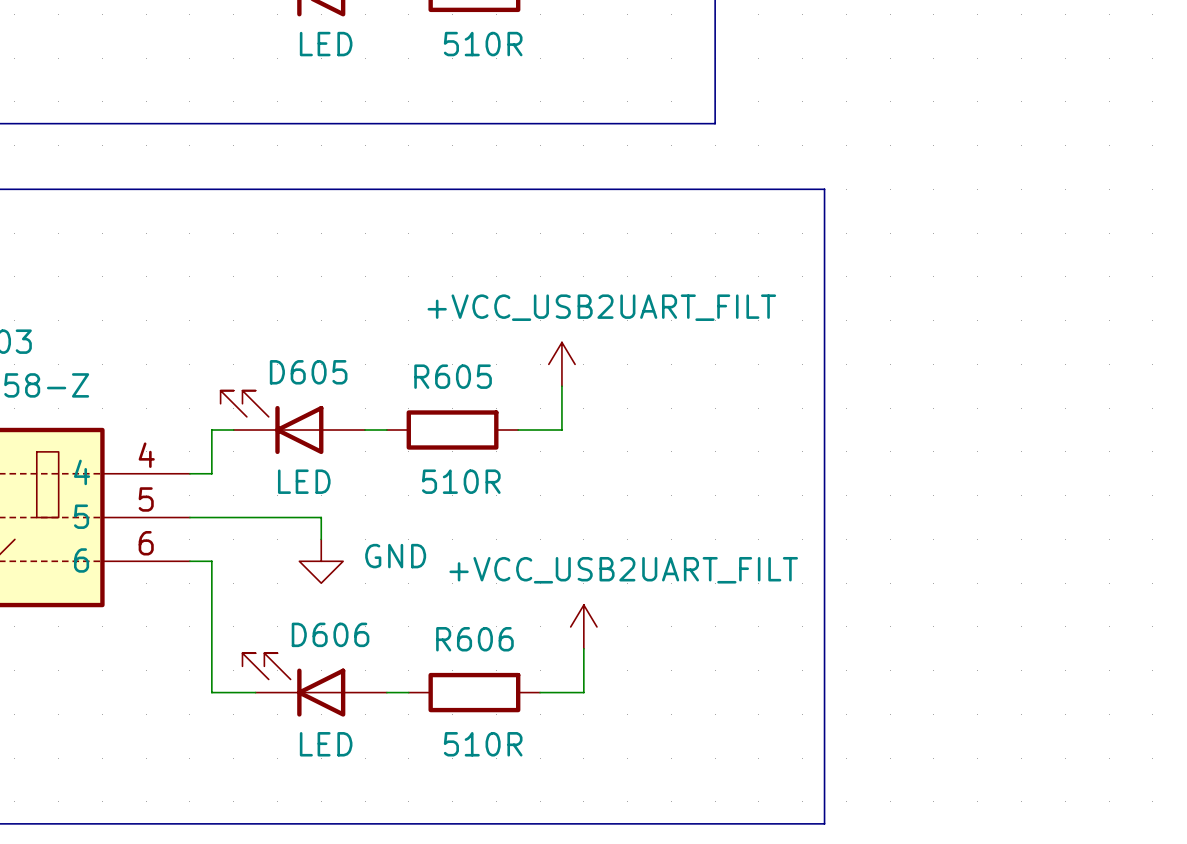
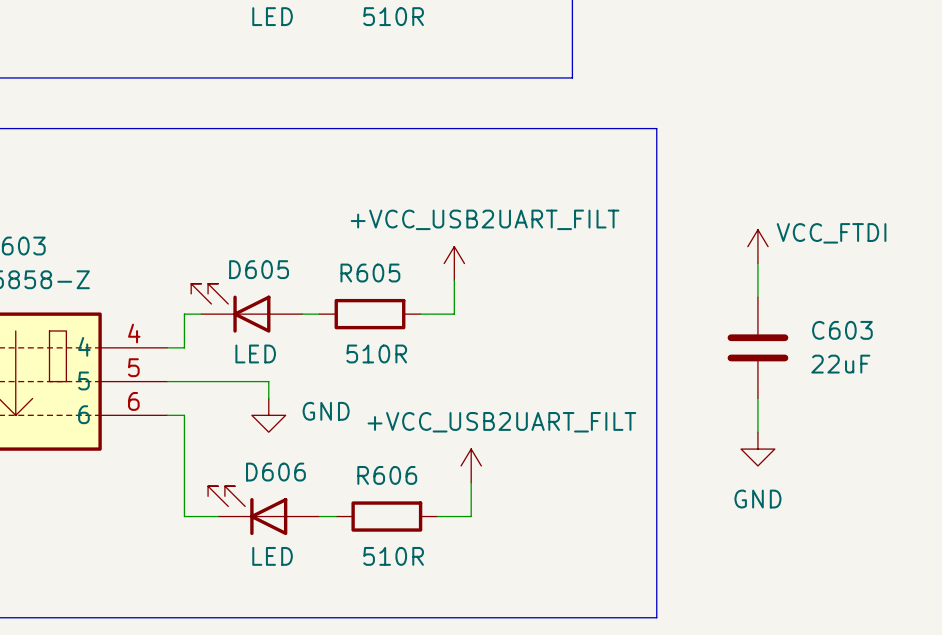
power symbol: none -> VCC_FTDI (757, 246)
wire: none -> (757, 263) (757, 297)
C603: none -> 22uF (757, 347)
wire: none -> (757, 398) (757, 432)
power symbol: none -> GND (757, 449)

